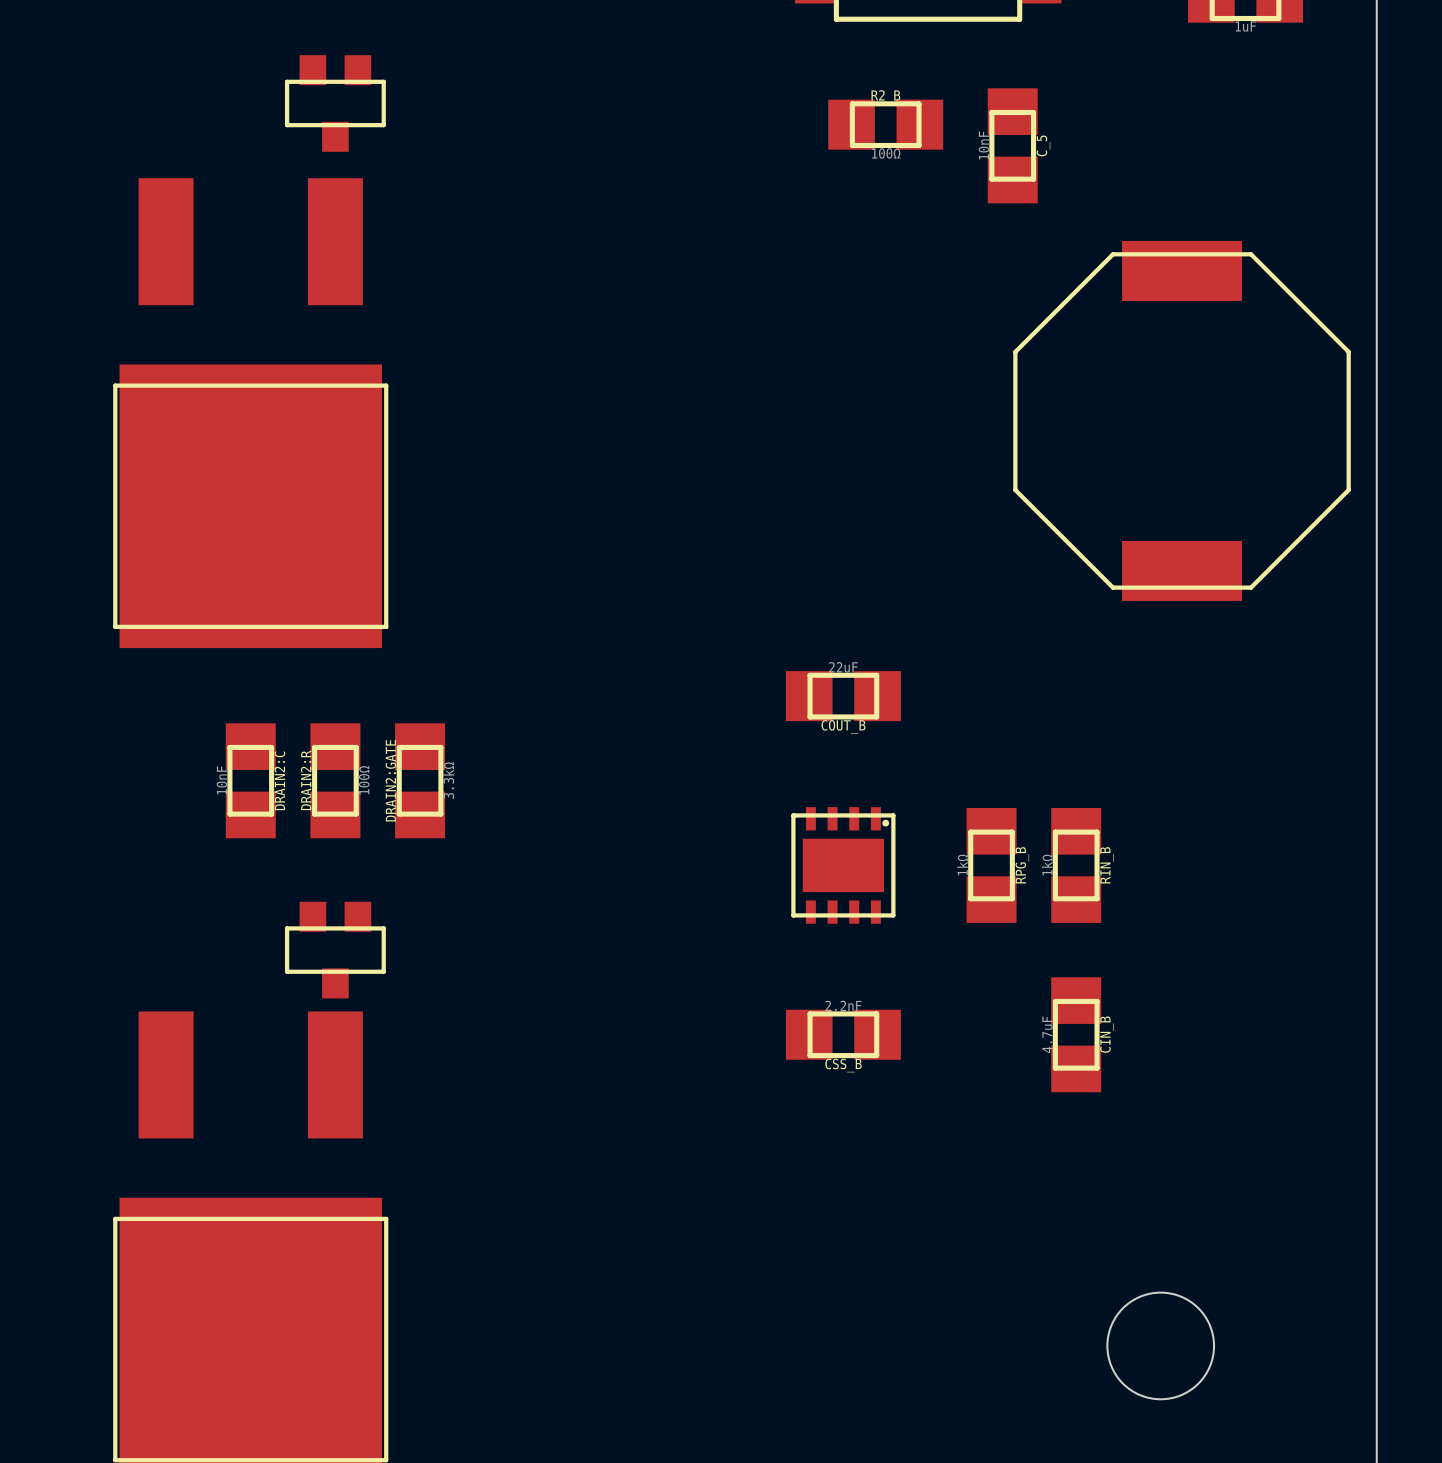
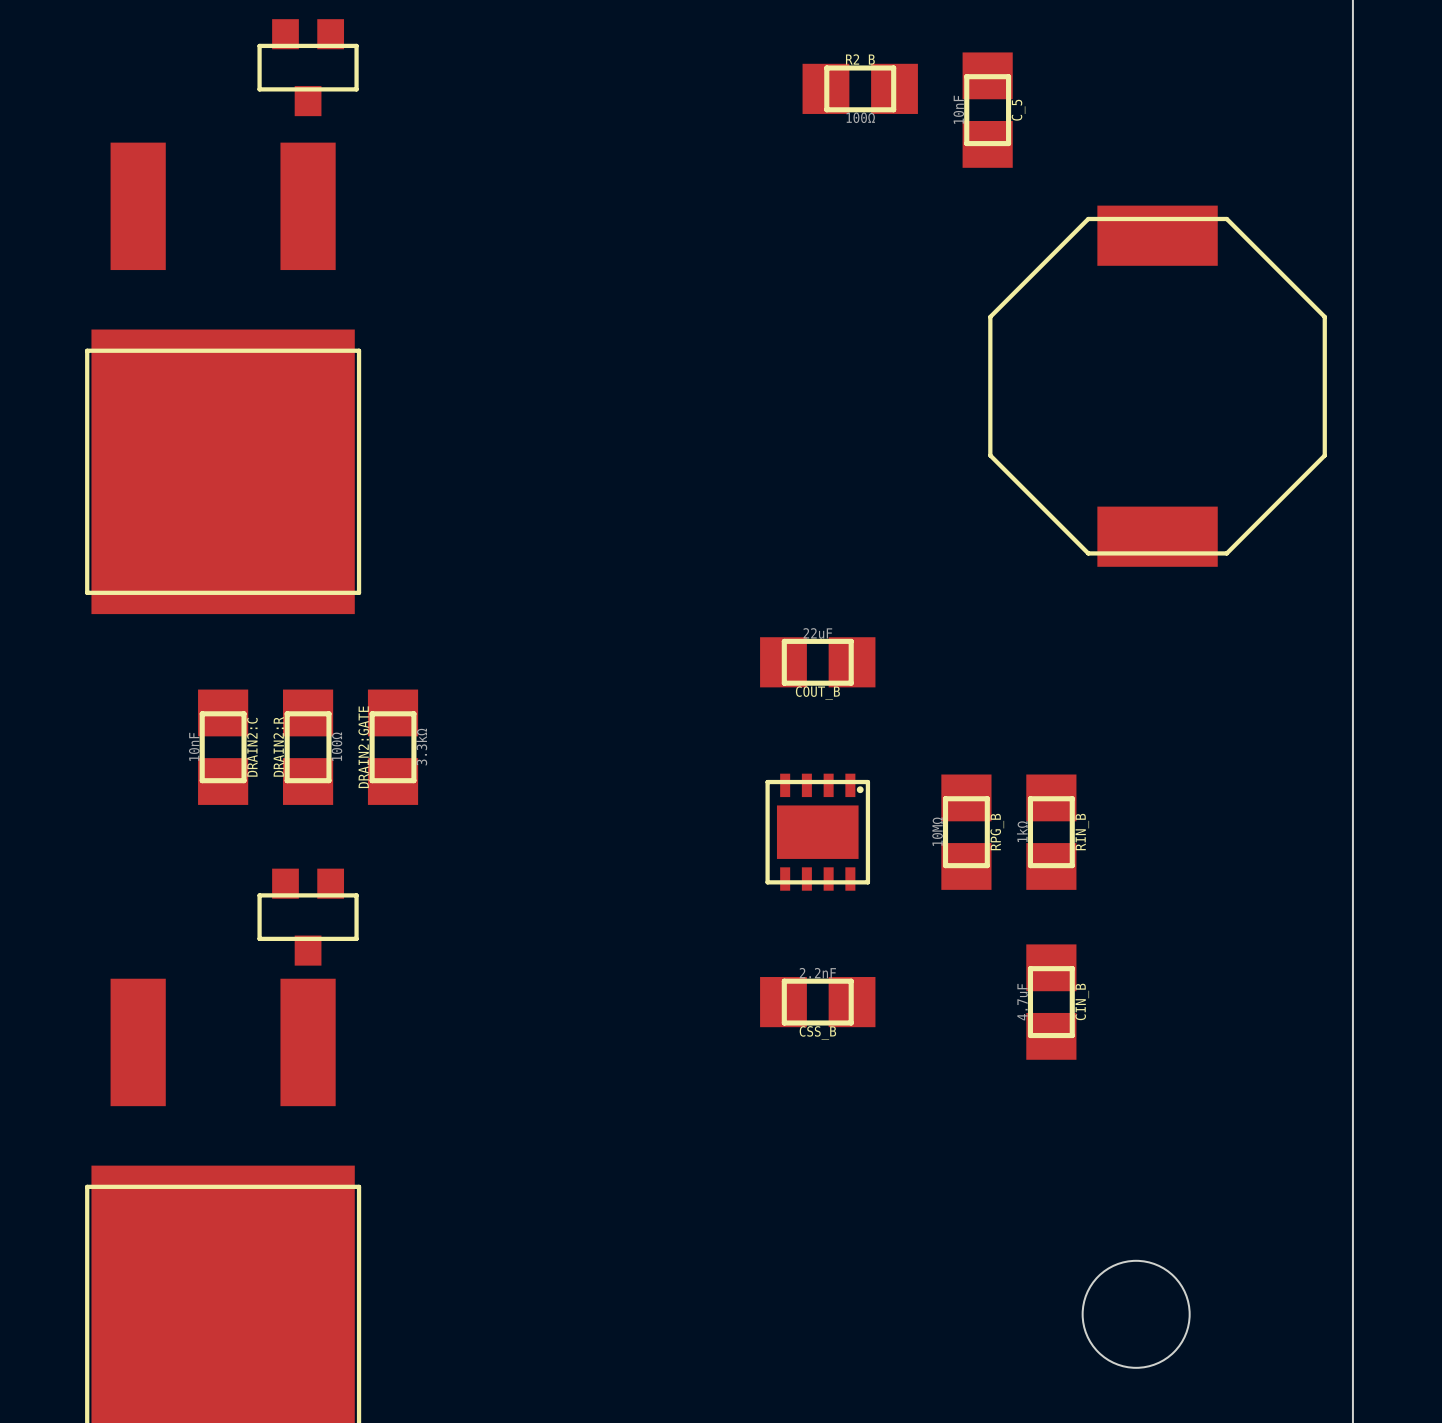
RPG_B value: 1kΩ (962, 864) -> 10MΩ (937, 831)

